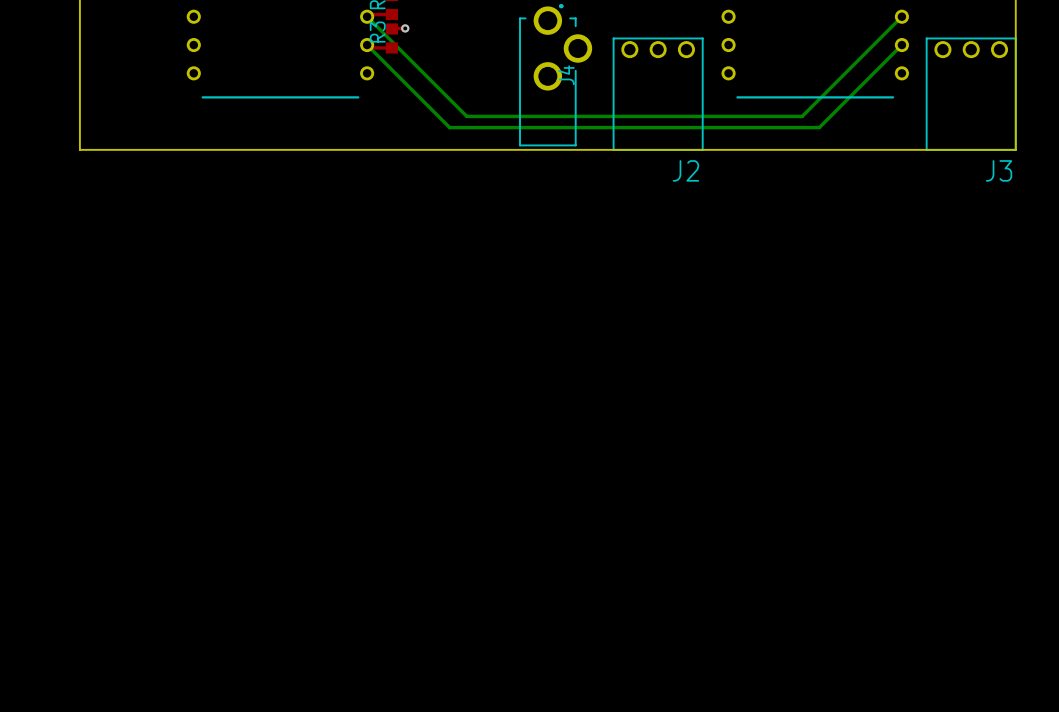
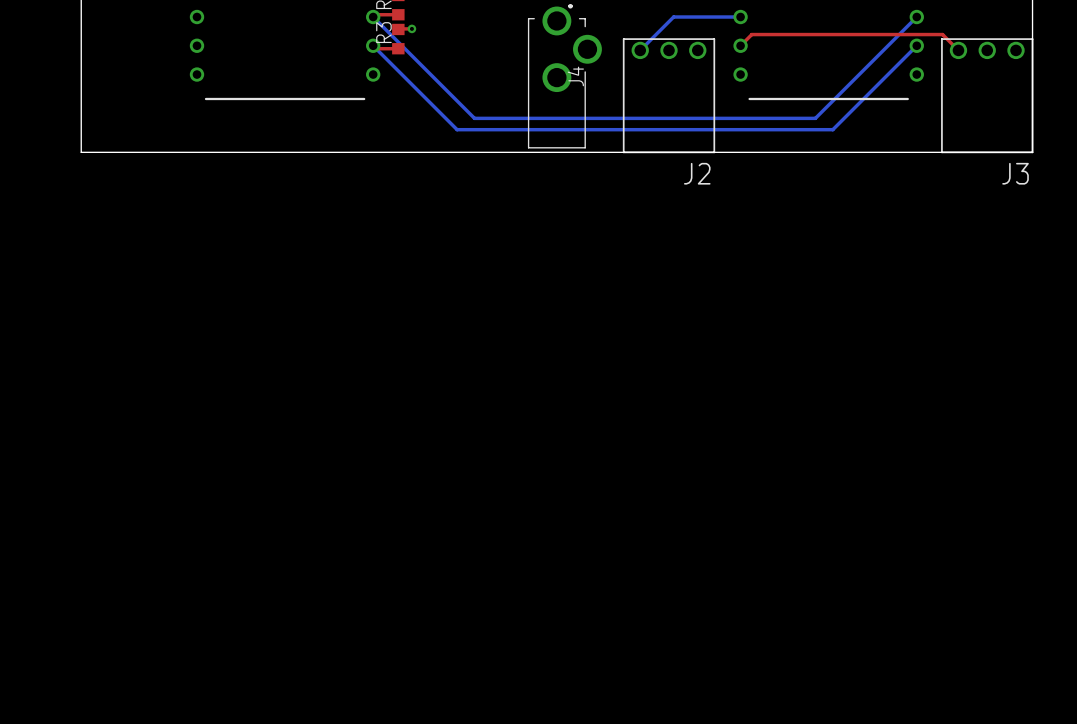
bottom track: none -> (740, 17) (673, 17) (640, 50)
top track: none -> (740, 45) (751, 34) (942, 34) (958, 50)

